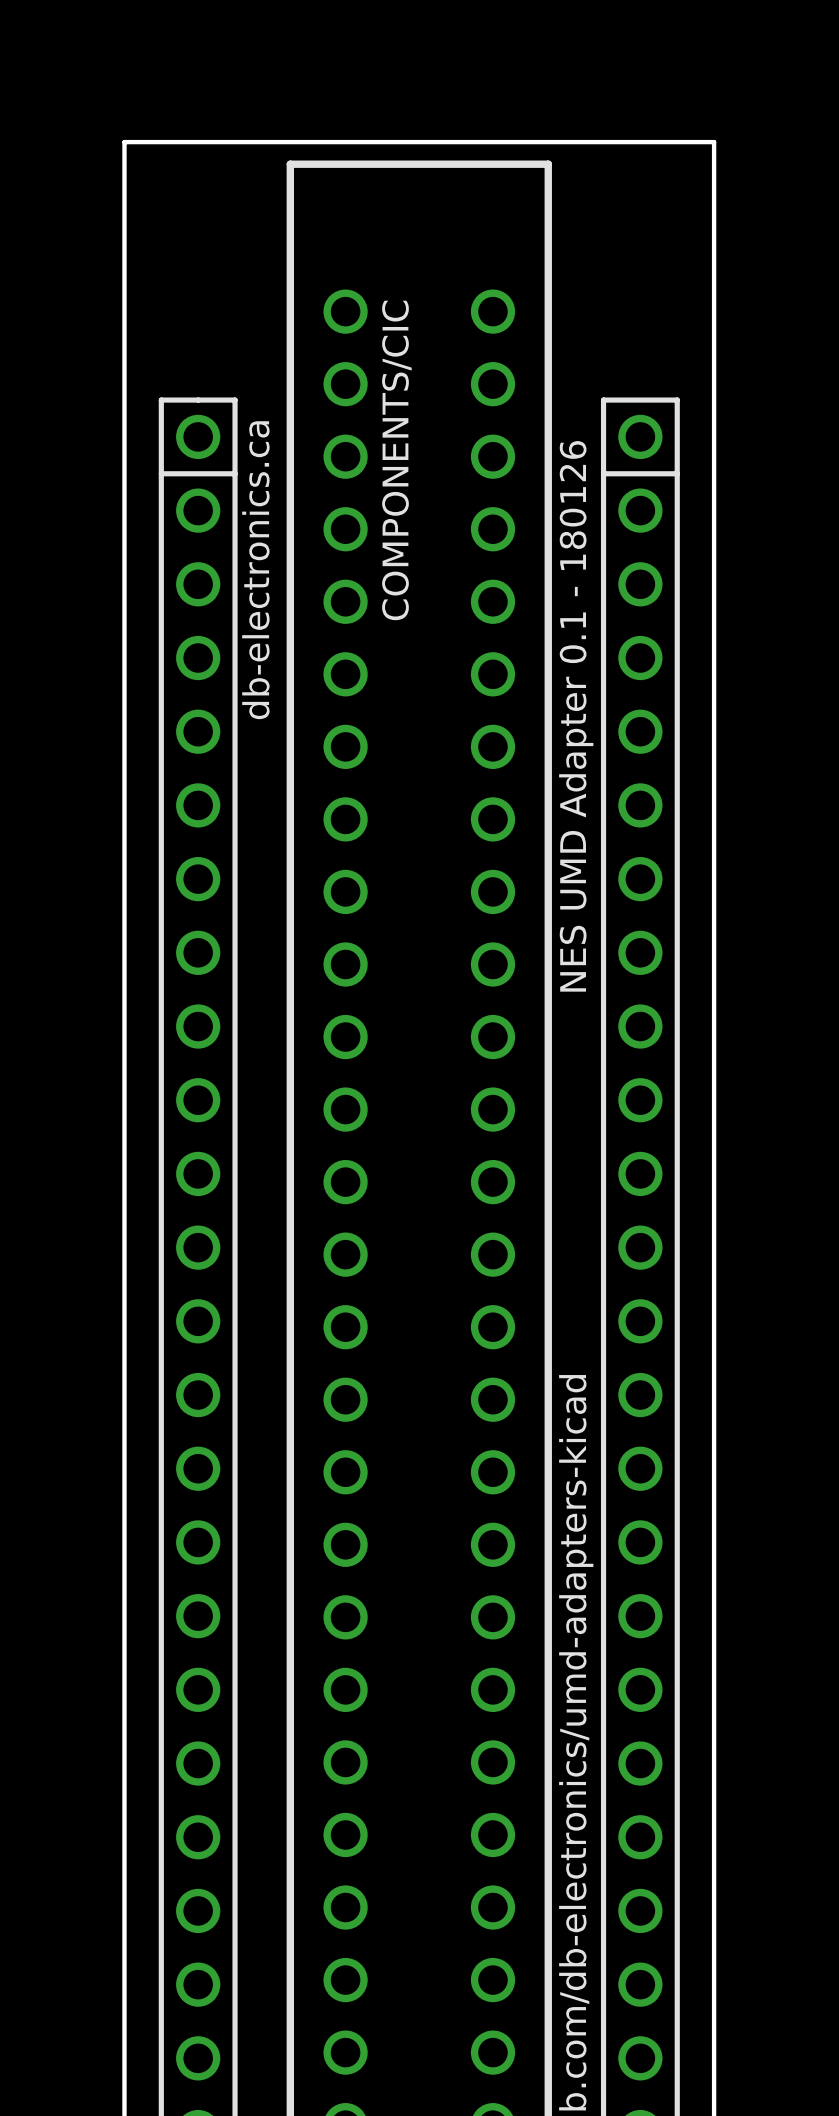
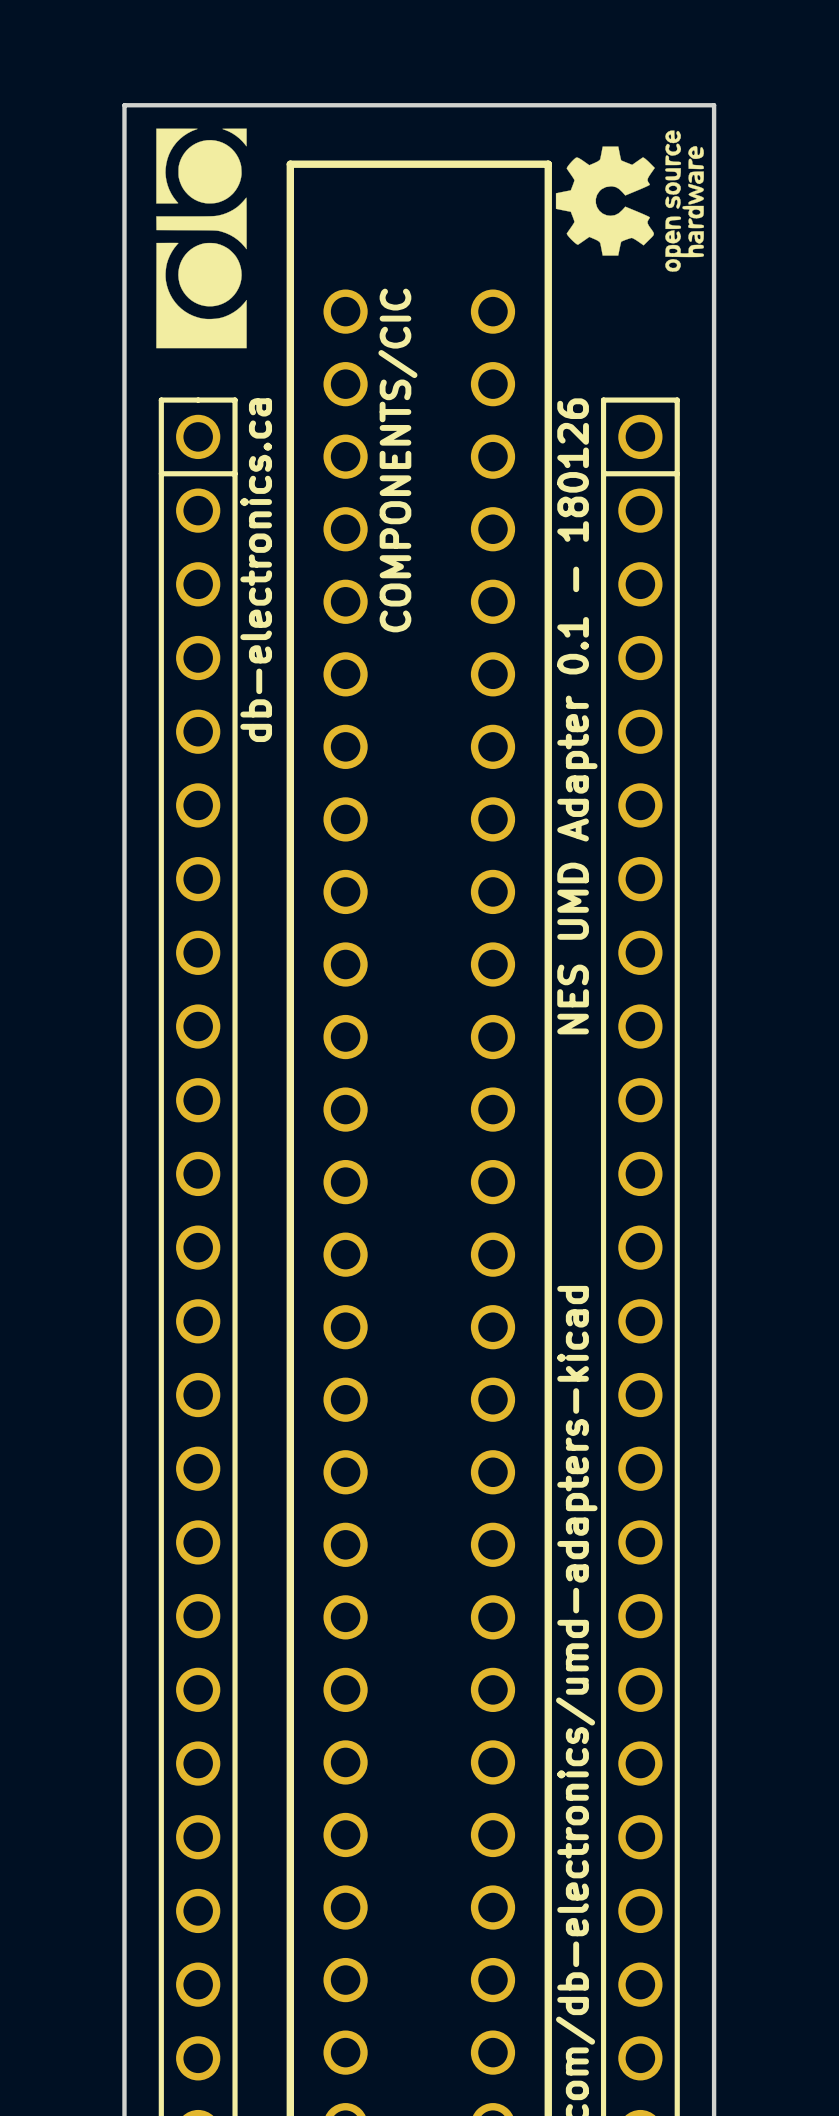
drawing: none -> [156, 128, 247, 349]
drawing: none -> [555, 130, 705, 272]
board edge: (124, 142) (714, 142) -> (124, 142) (124, 105) (714, 105) (714, 142)

